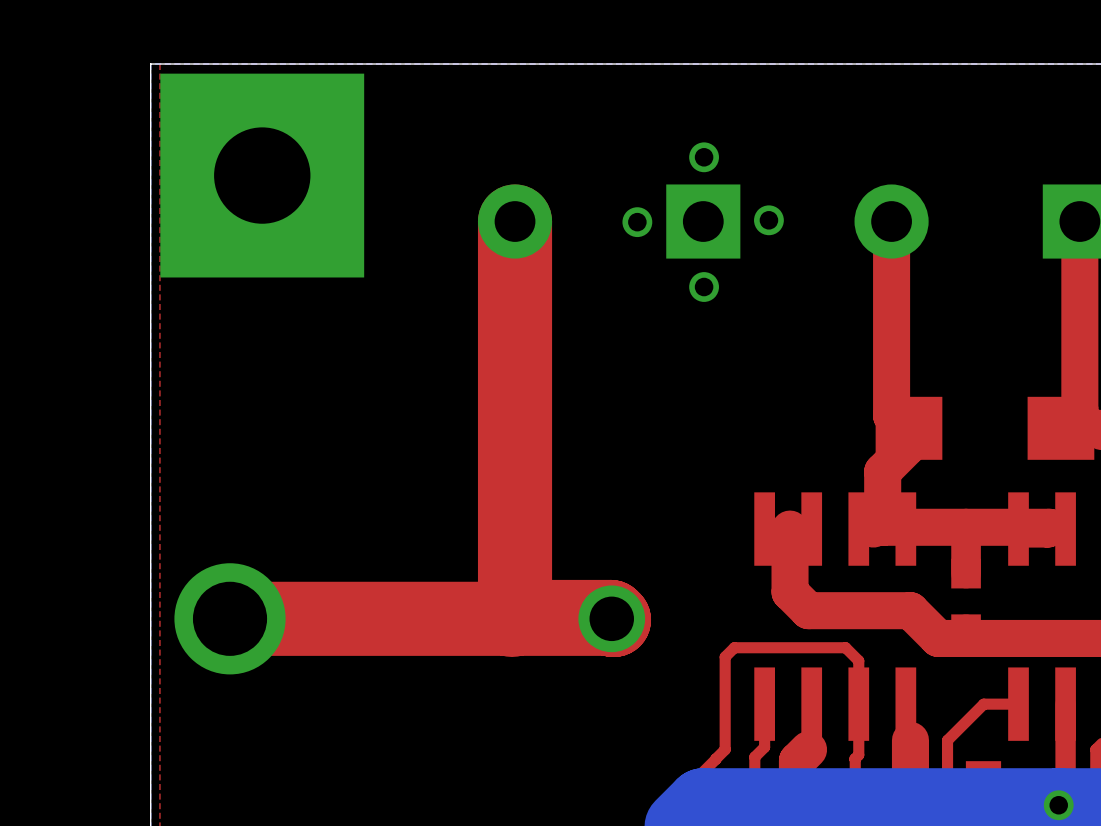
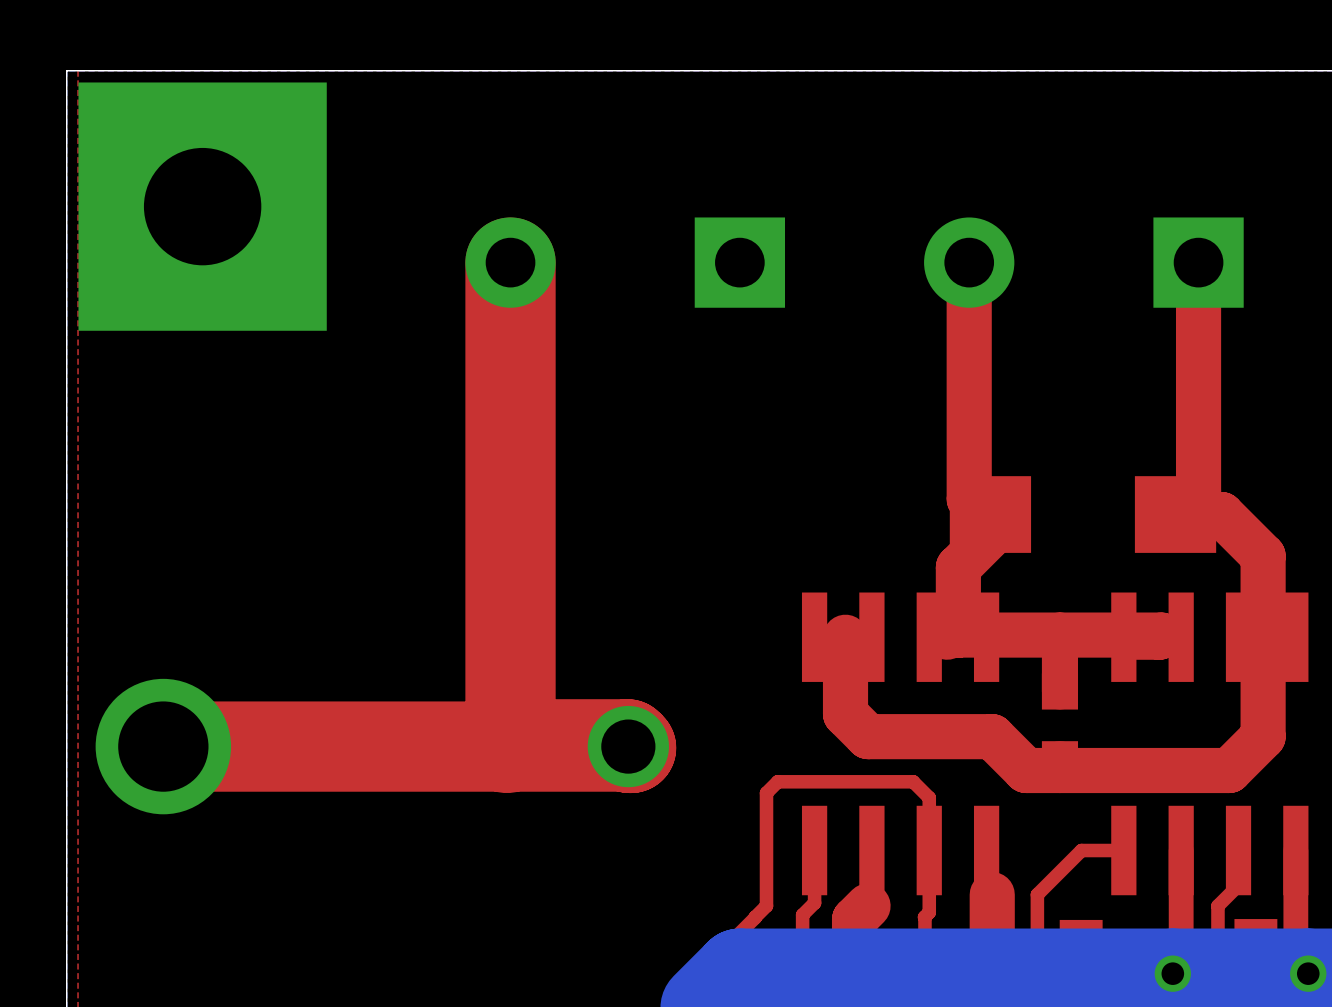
via: (704, 157) -> none
via: (768, 220) -> none
via: (637, 222) -> none
via: (704, 287) -> none

